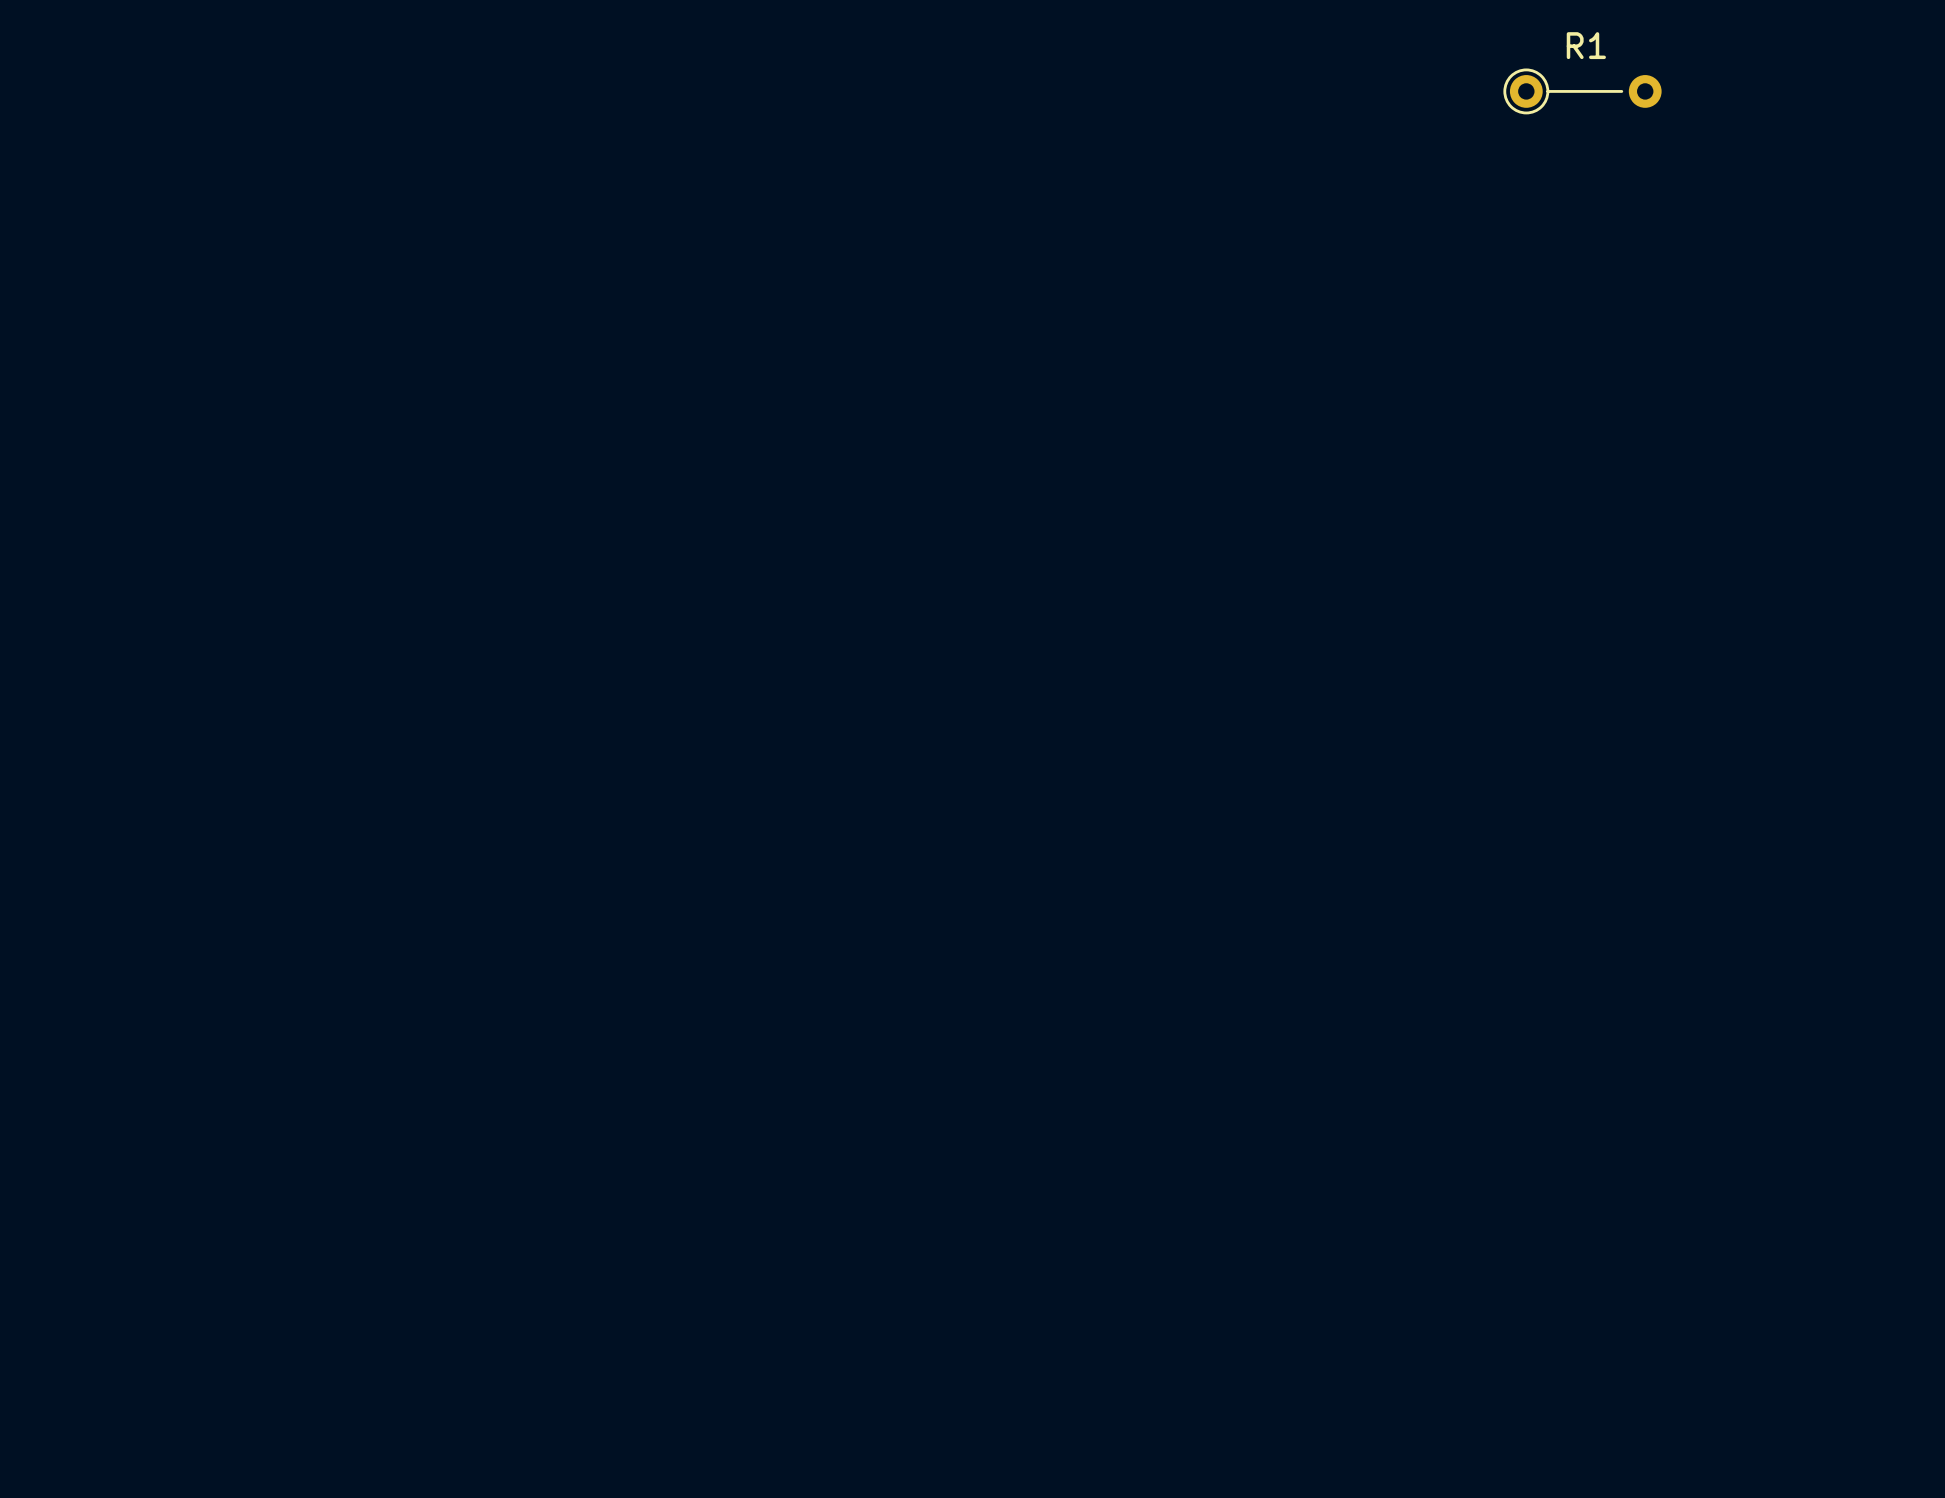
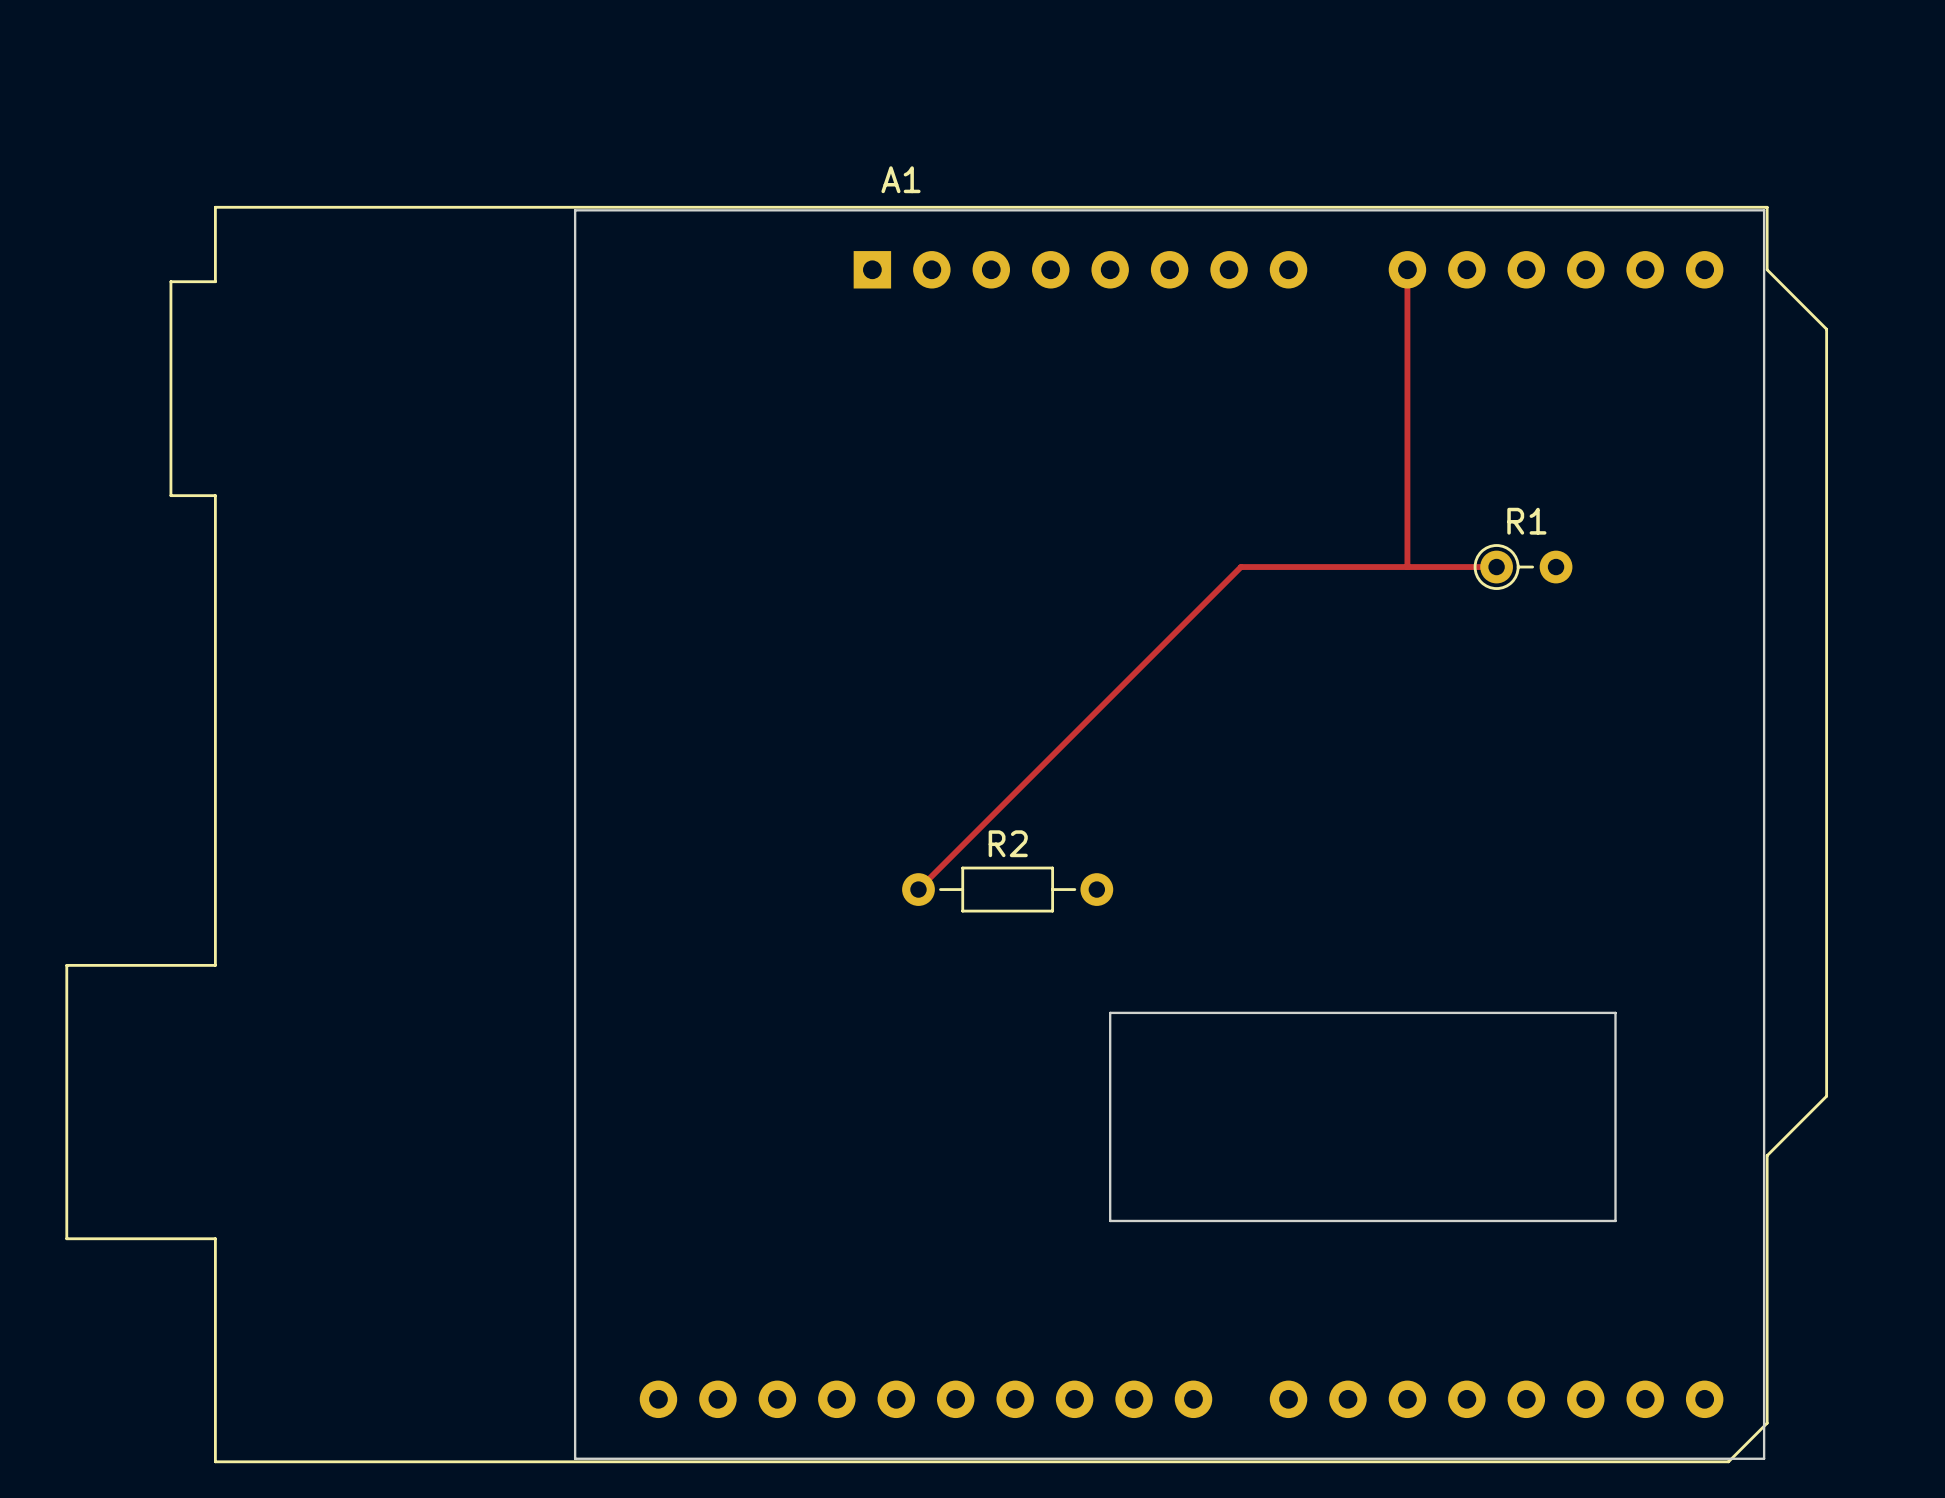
R1 footprint: [1503, 68, 1662, 115] -> [1473, 544, 1573, 590]
board edge: none -> (575, 210) (1764, 210) (1764, 1458) (575, 1458) (575, 210)
track: none -> (1407, 269) (1407, 567)
track: none -> (1496, 567) (1241, 567) (918, 889)
A1: none -> (946, 834)
R2: none -> (1007, 889)
board edge: none -> (1110, 1012) (1110, 1220) (1615, 1220) (1615, 1012) (1110, 1012)

